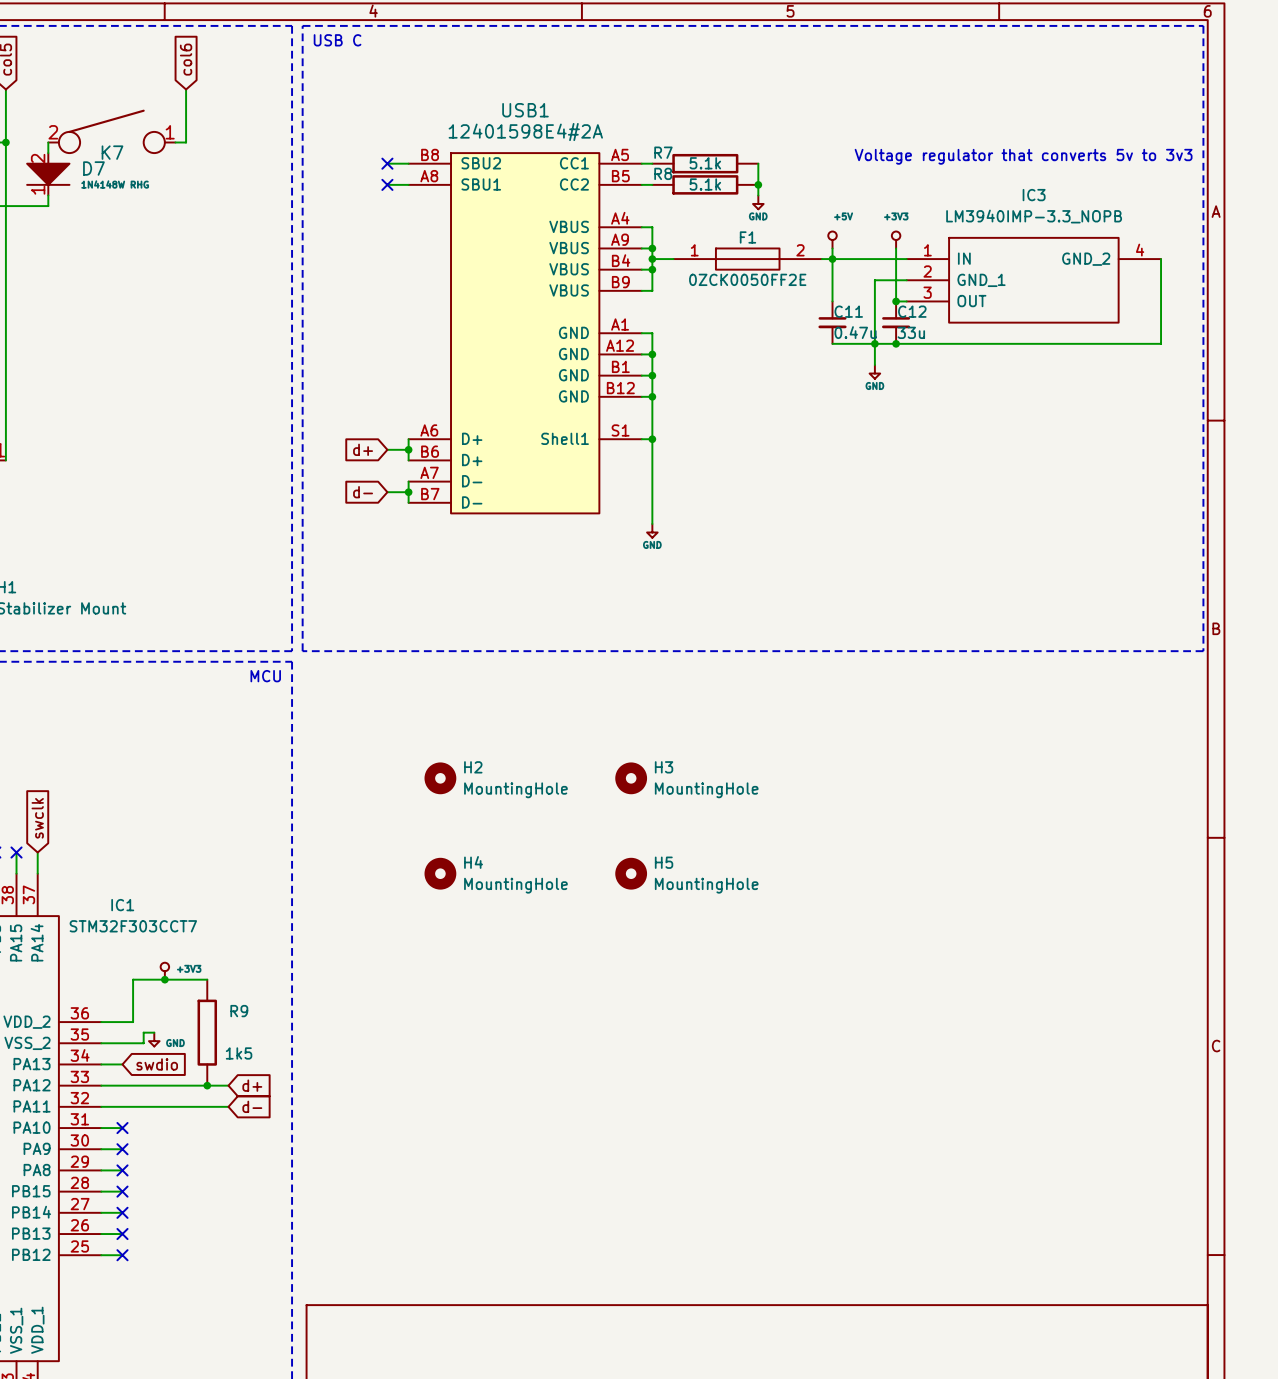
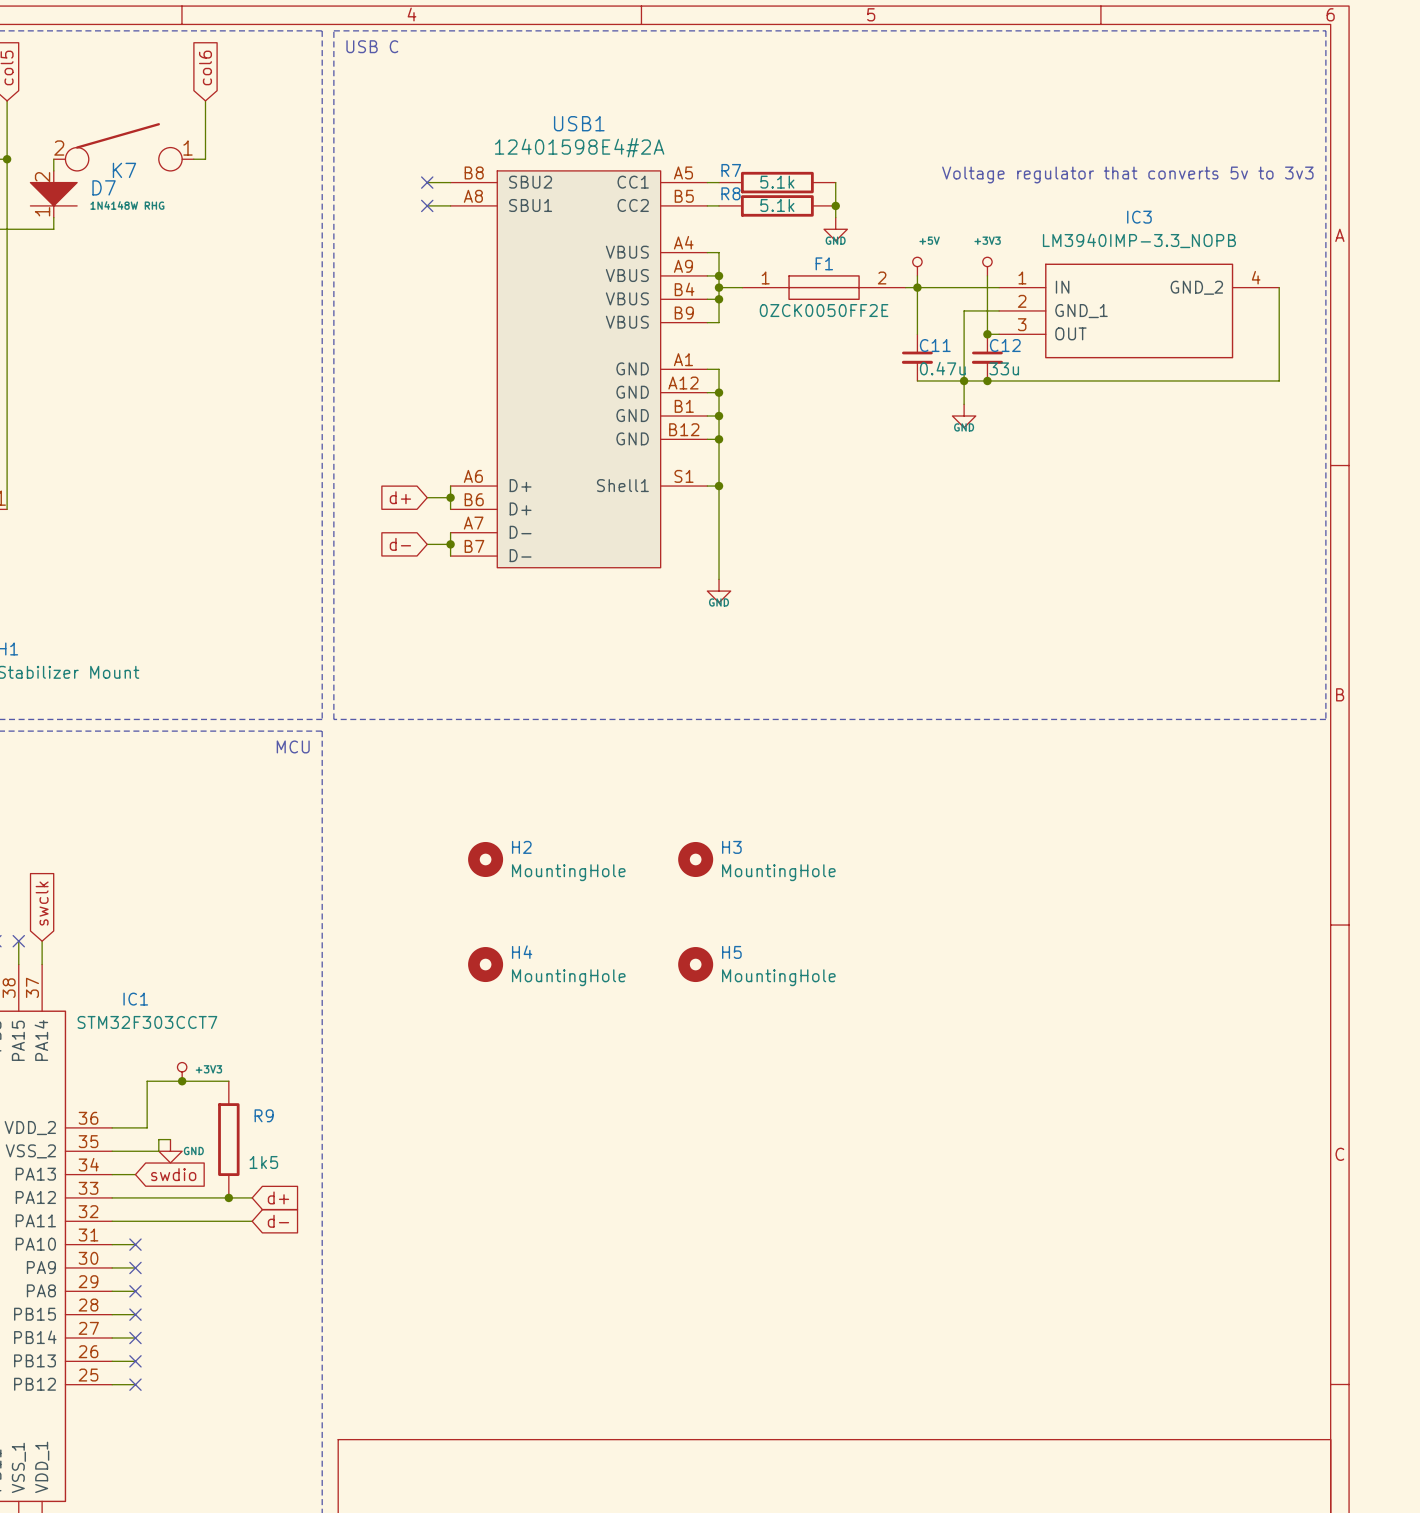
power symbol shape: [753, 195, 764, 210] -> [824, 217, 848, 241]
power symbol shape: [869, 365, 881, 379] -> [952, 404, 976, 428]
power symbol shape: [647, 523, 658, 538] -> [707, 579, 731, 603]
power symbol shape: [148, 1032, 160, 1047] -> [158, 1139, 183, 1163]

